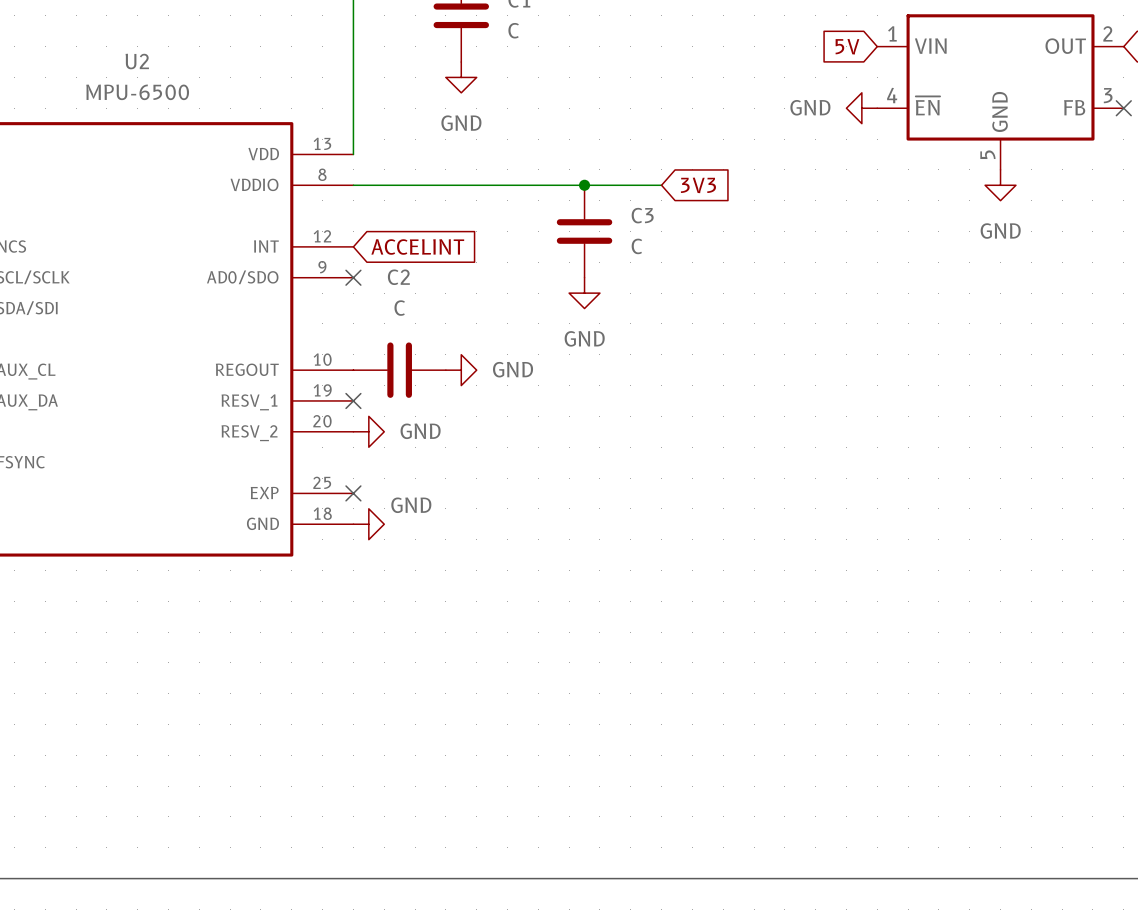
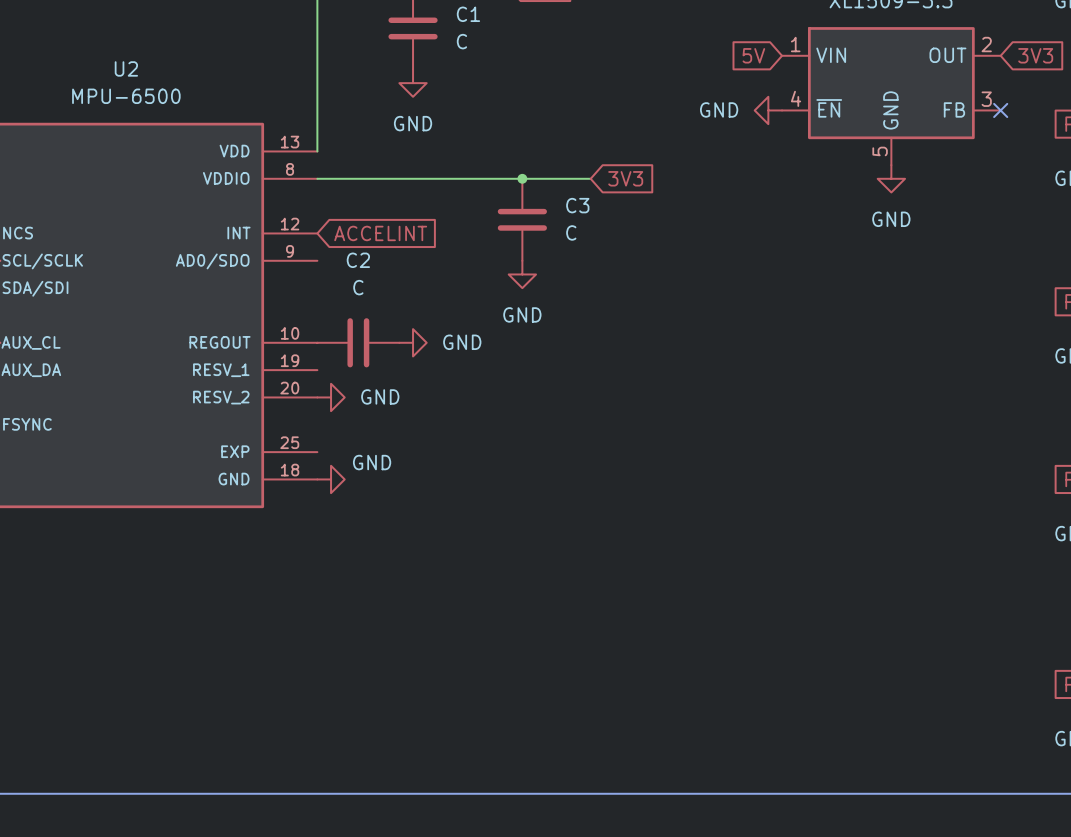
no-connect mark: (353, 277) -> none
no-connect mark: (353, 400) -> none
no-connect mark: (353, 493) -> none

